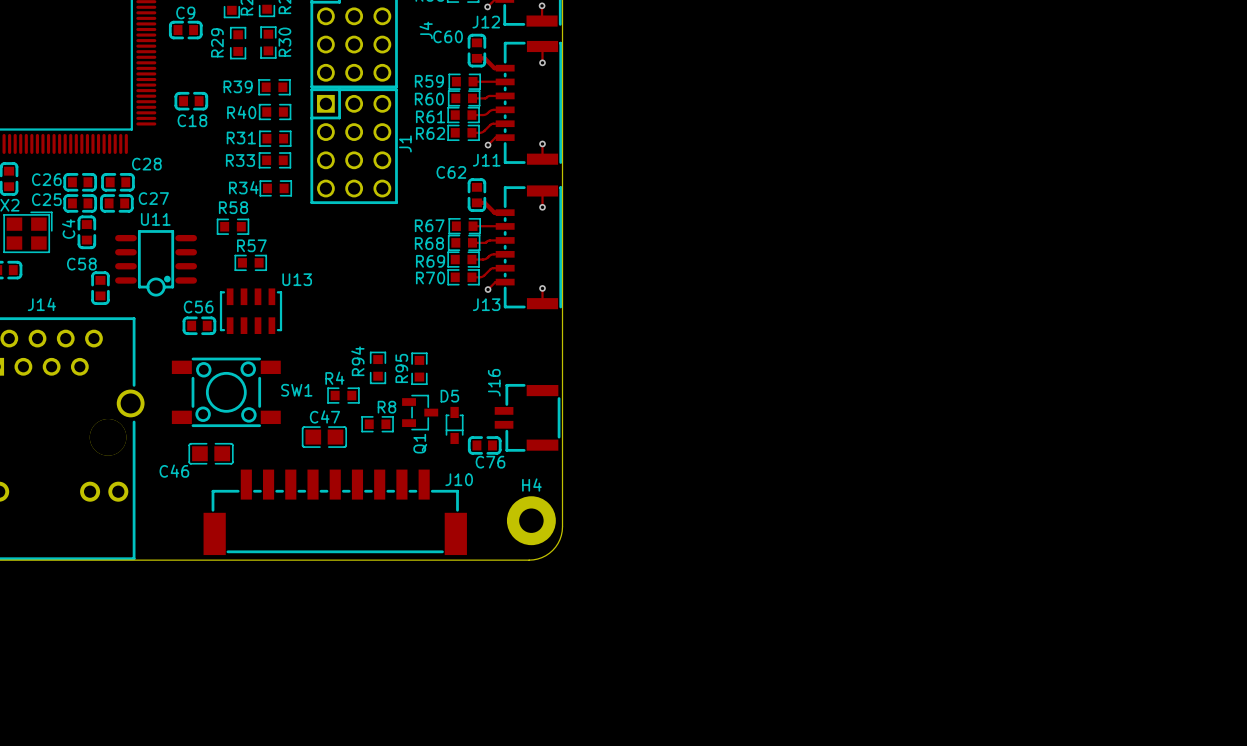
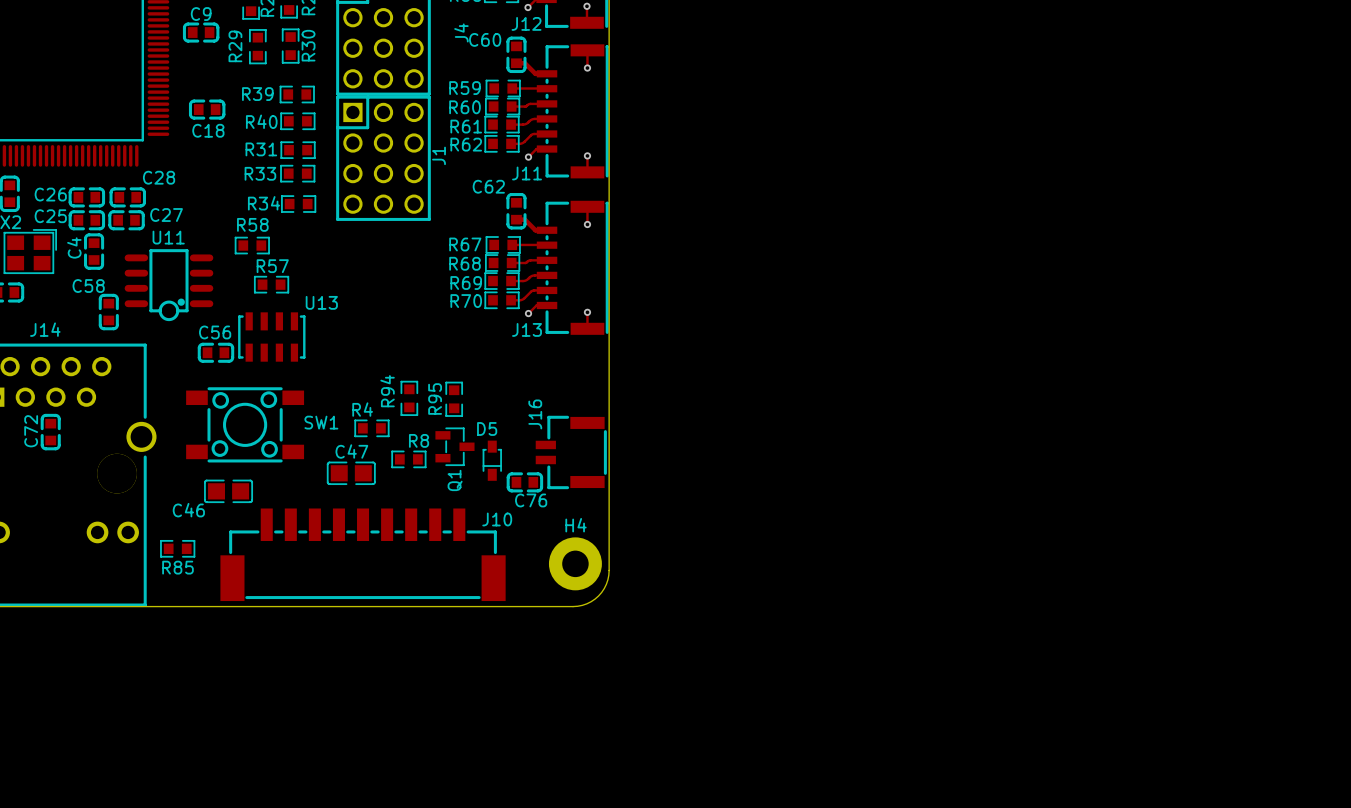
C72: none -> (50, 432)
R85: none -> (177, 548)

